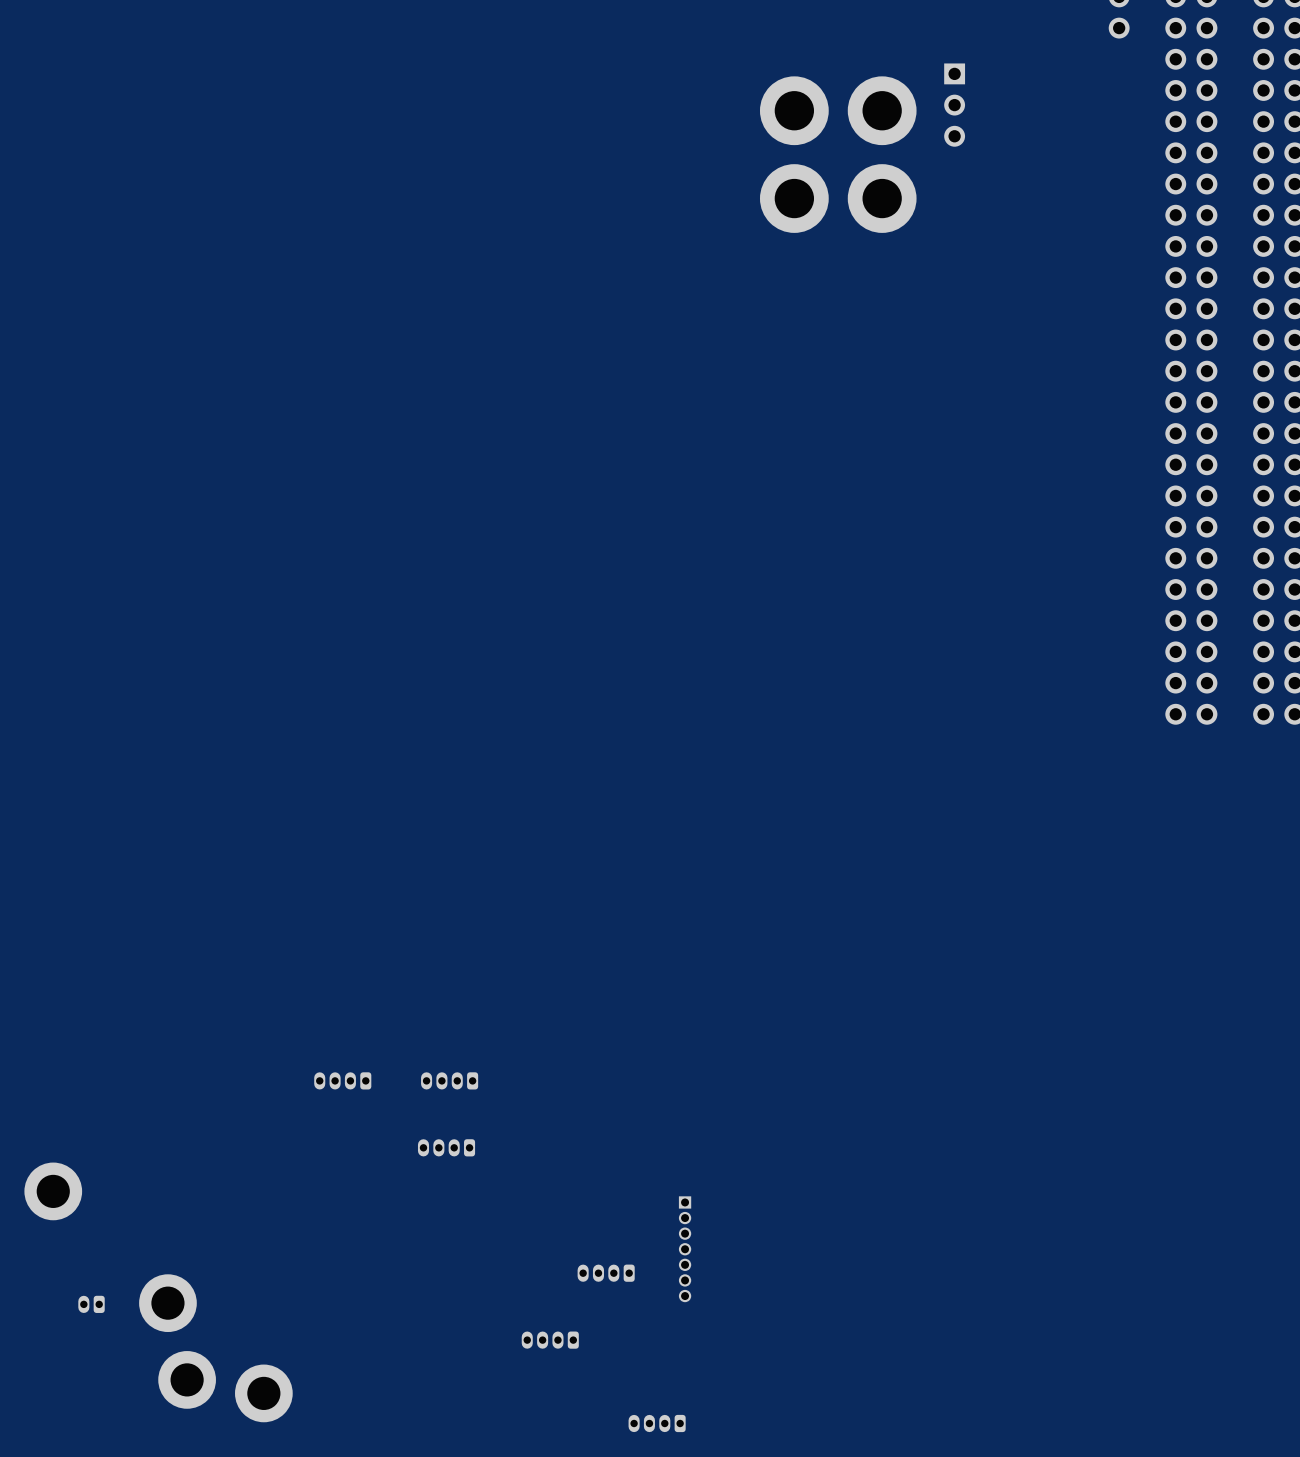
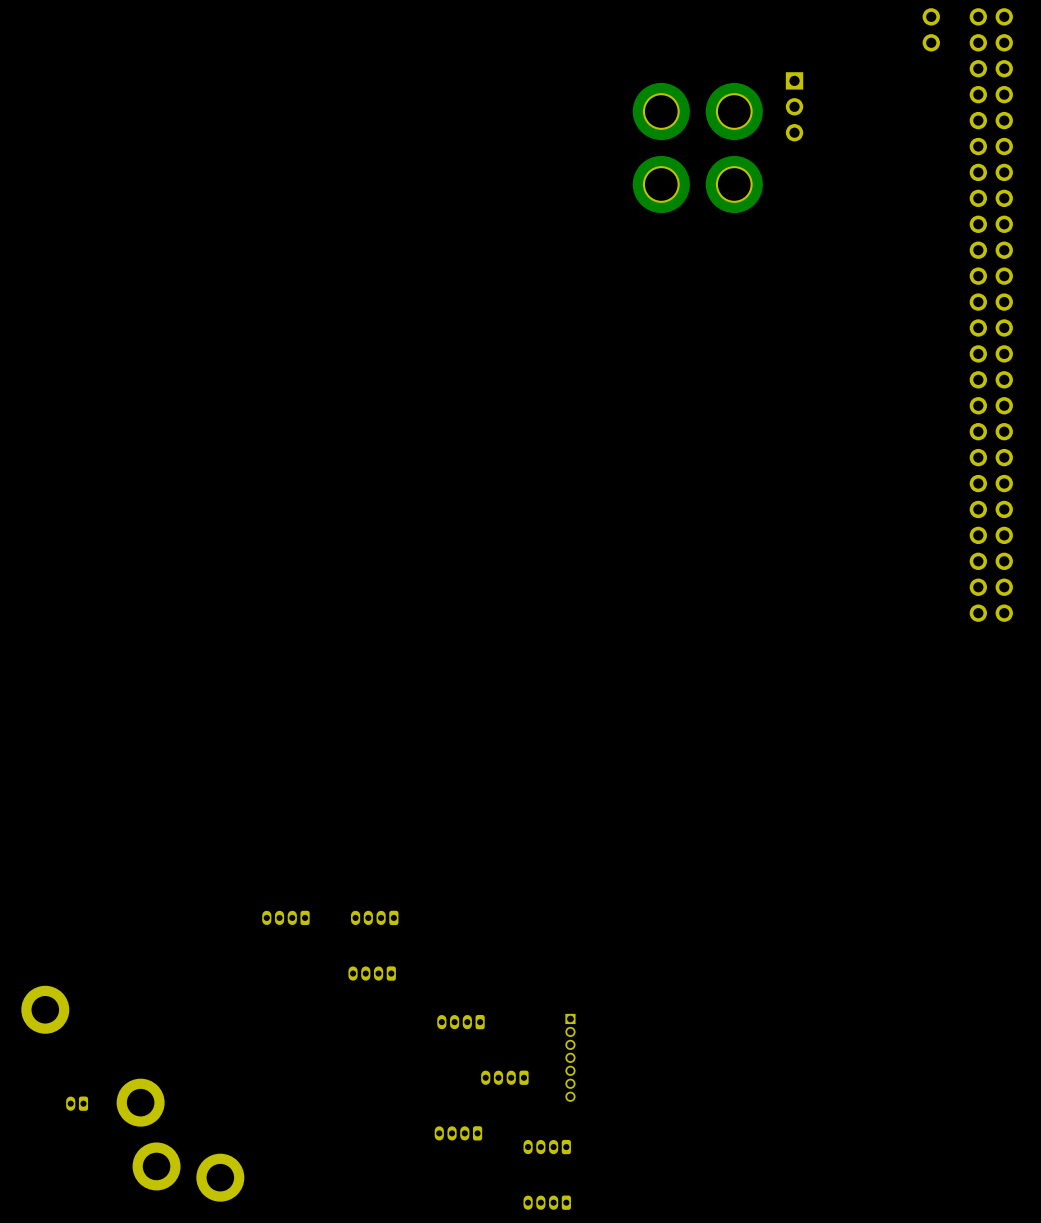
part: none -> (460, 1022)
part: none -> (547, 1147)

